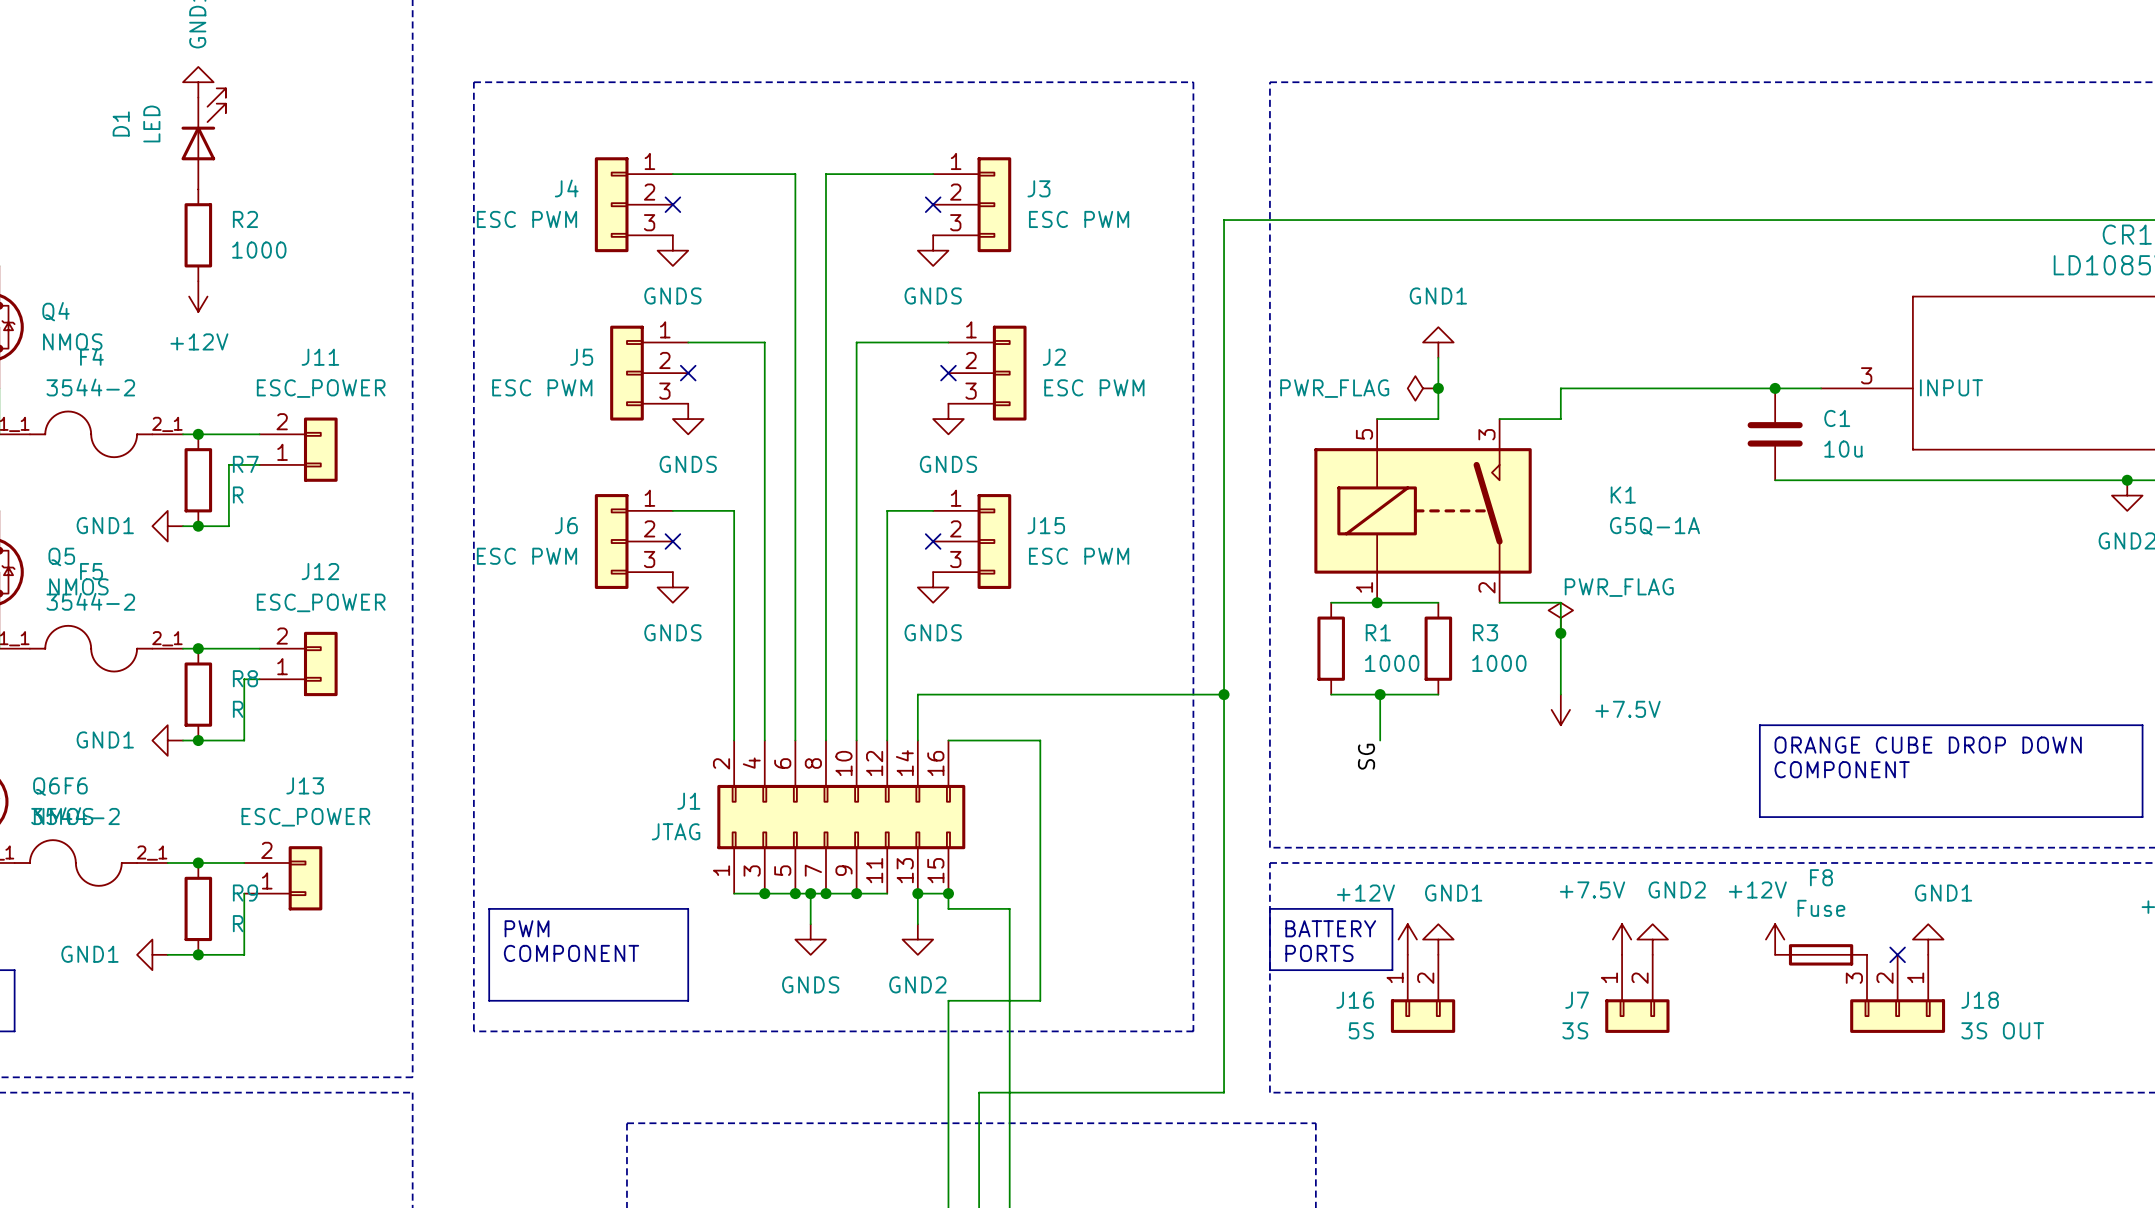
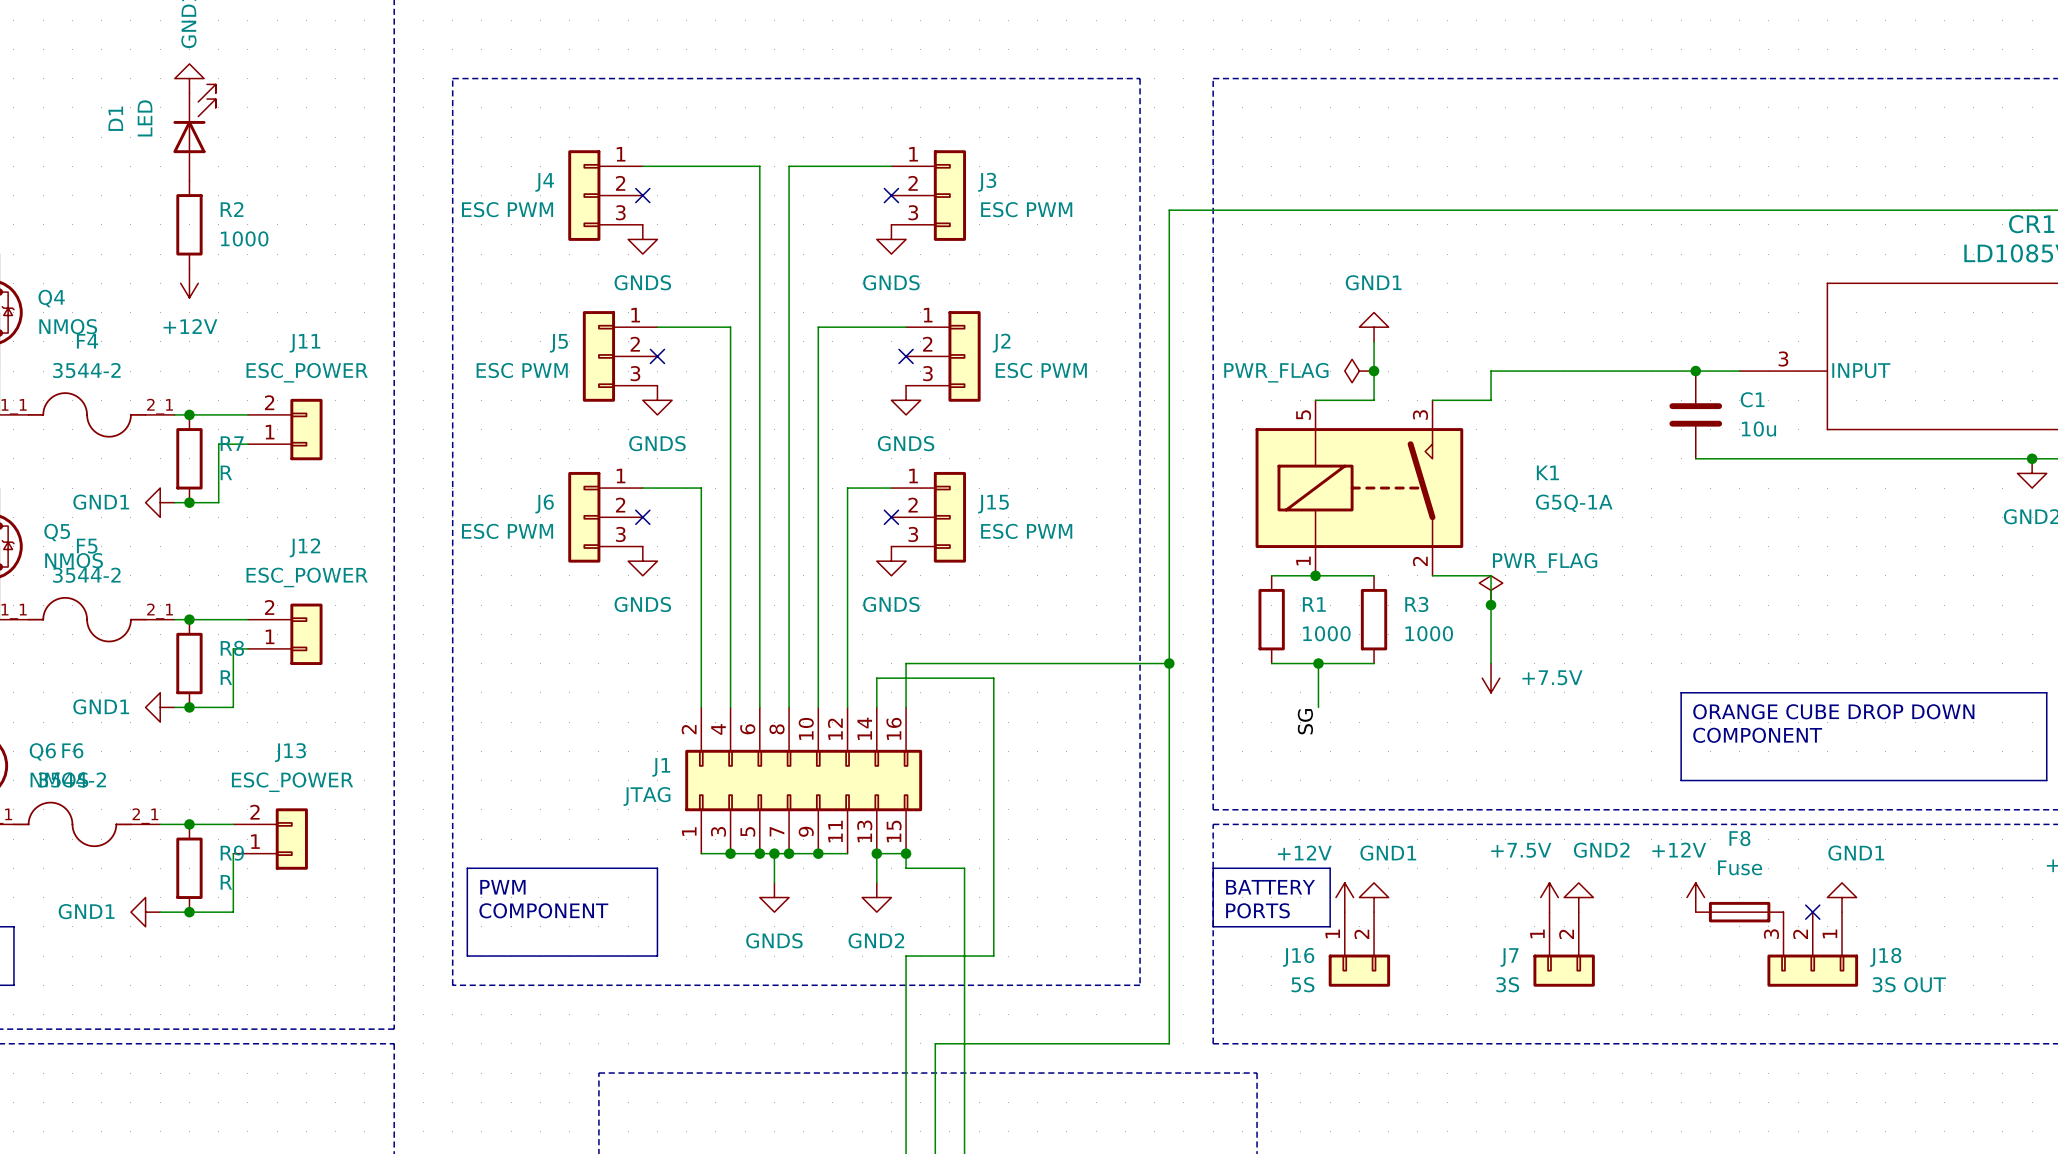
wire: (948, 694) (917, 694) (917, 709) -> (906, 663) (906, 707)
wire: (948, 740) (1040, 740) -> (876, 678) (993, 678) (993, 707)

